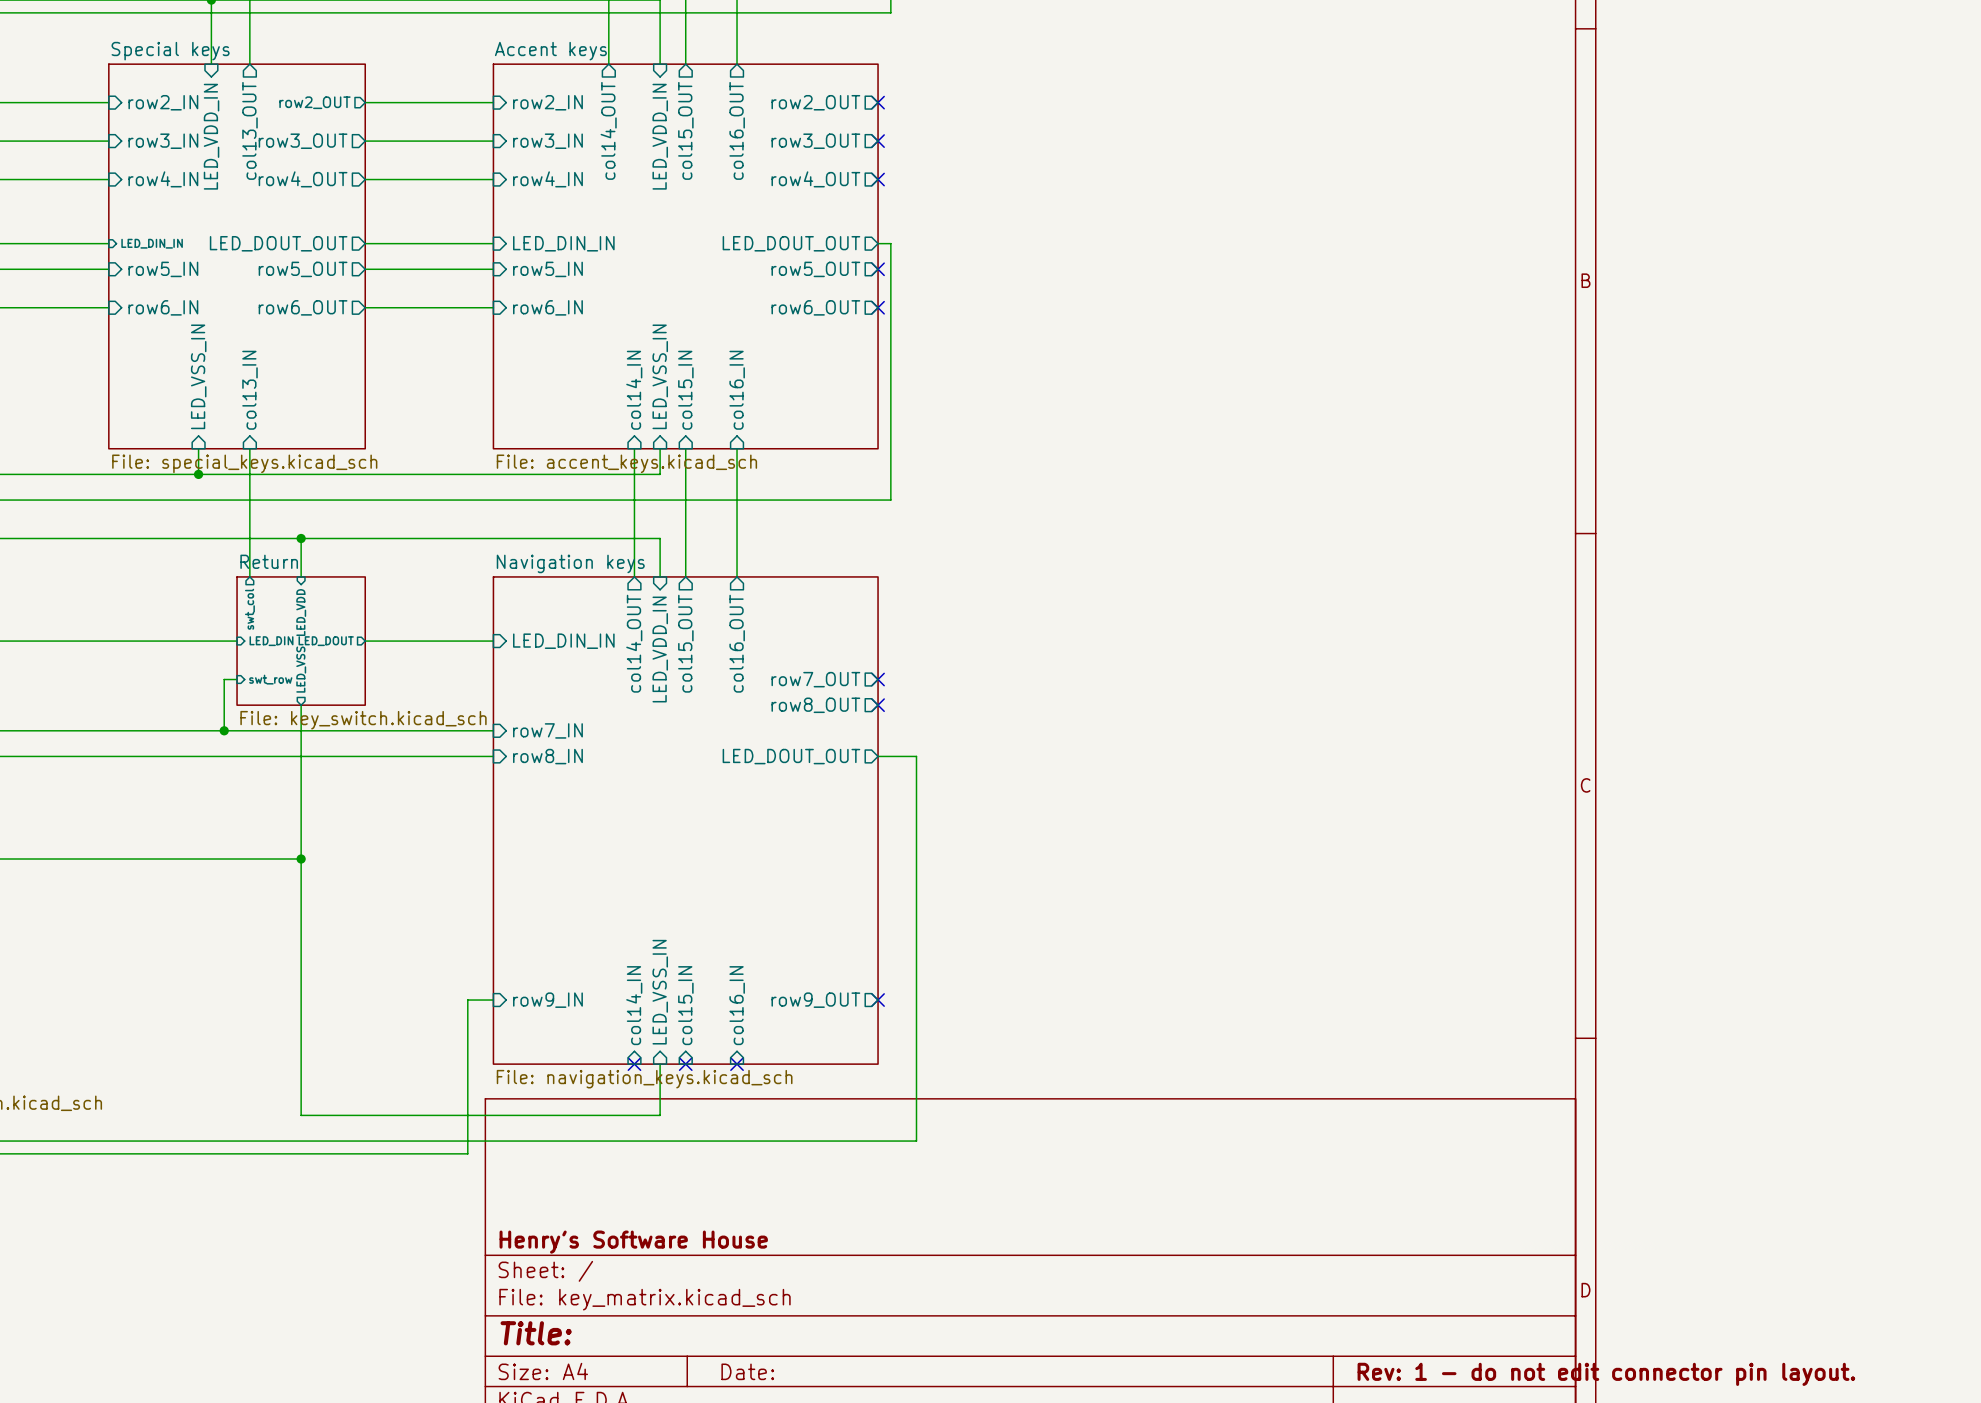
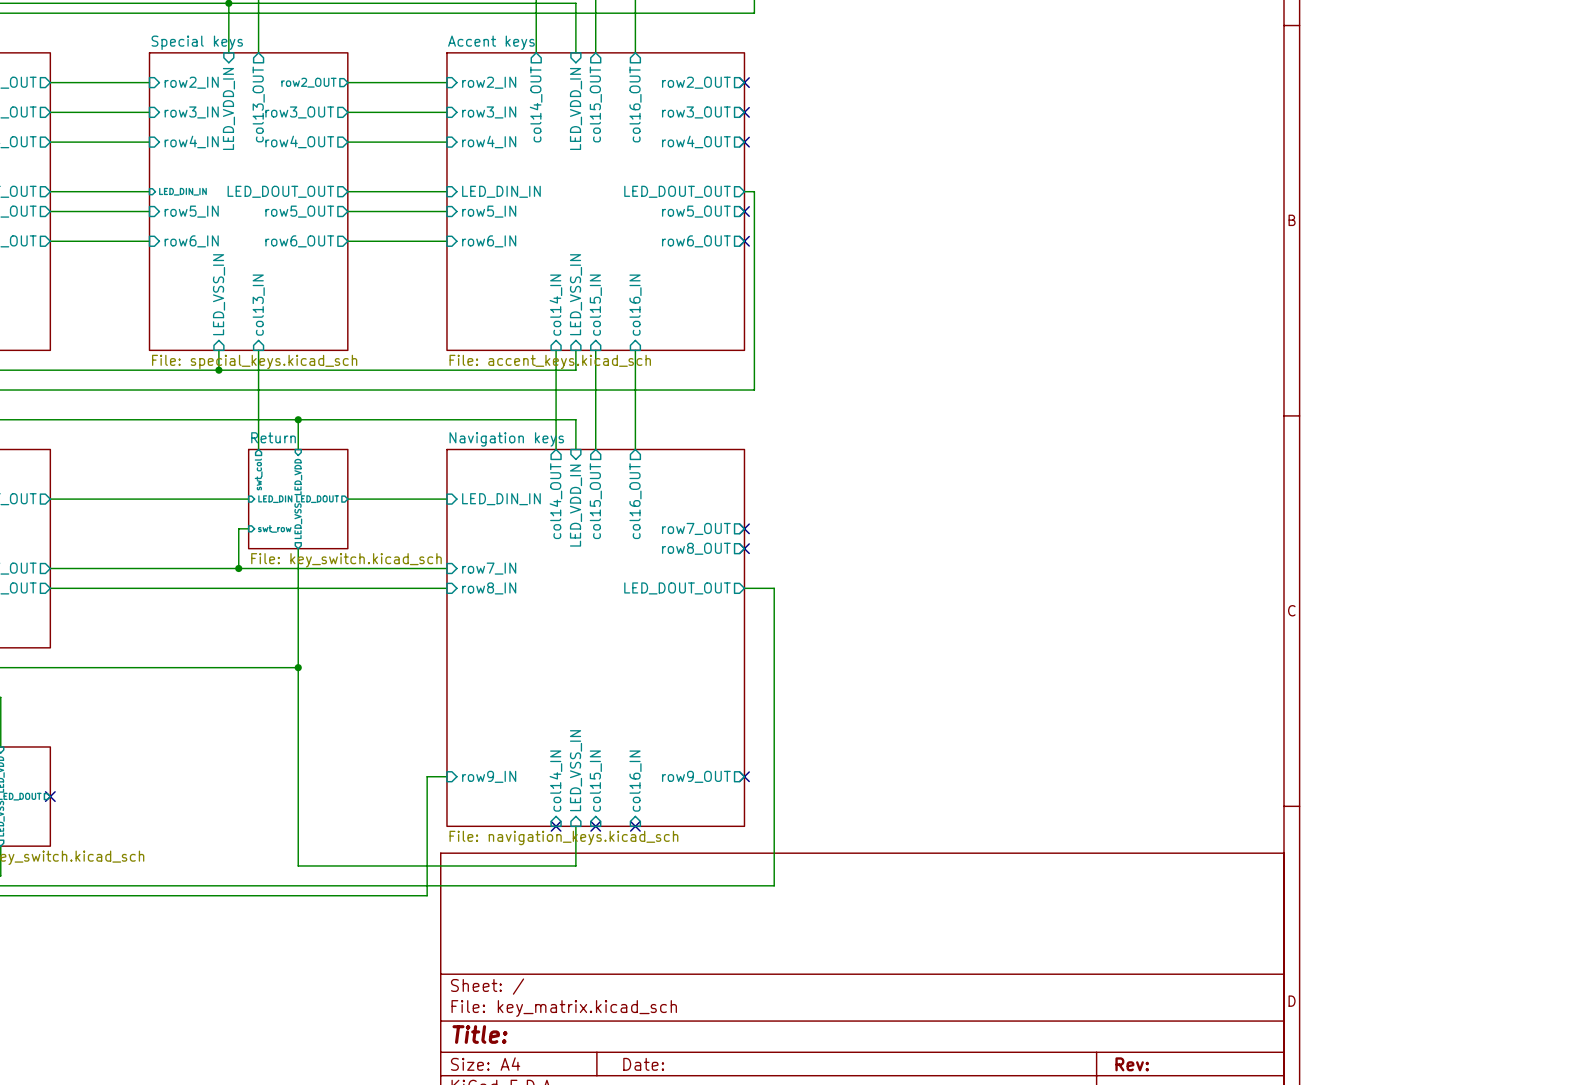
title block: Henry's Software House (633, 1242) -> none
title block: Rev: 1 - do not edit connector pin layout. (1606, 1374) -> Rev: (1132, 1064)

